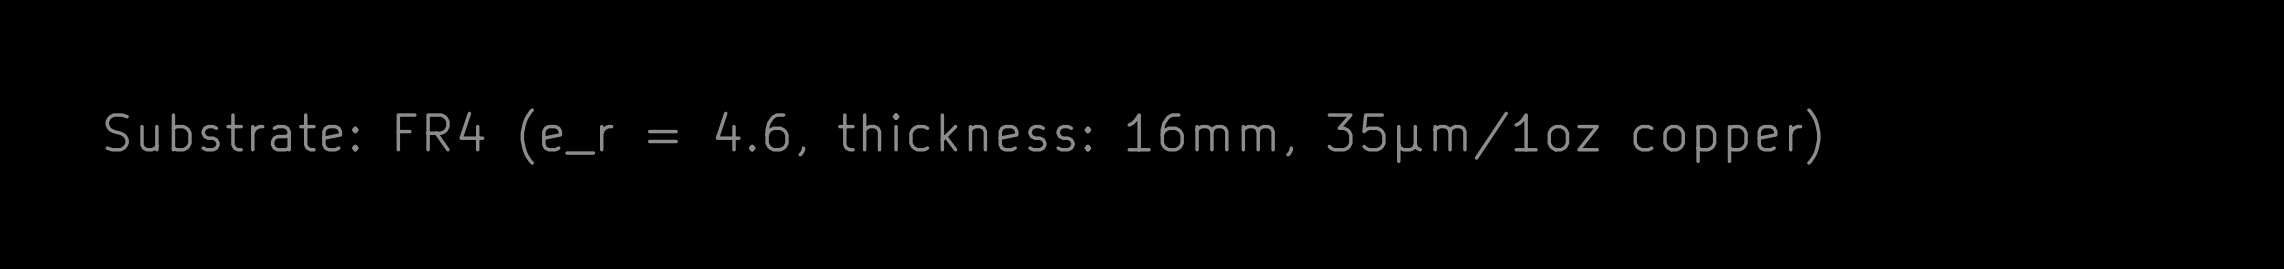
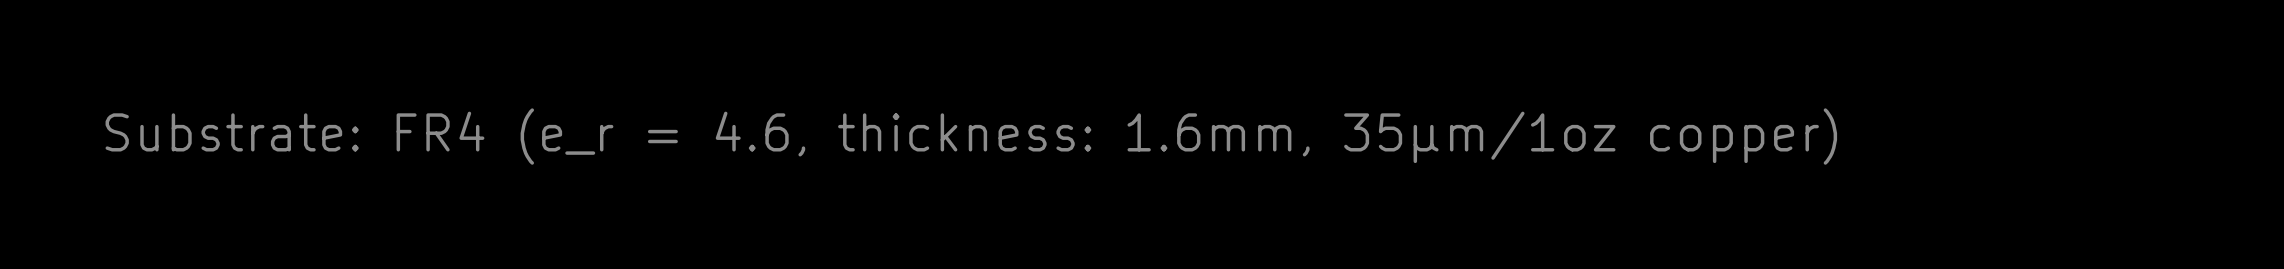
text: Substrate: FR4 (e_r = 4.6, thickness: 16mm, 35µm/1oz copper) (963, 136) -> Substrate: FR4 (e_r = 4.6, thickness: 1.6mm, 35µm/1oz copper) (971, 136)

